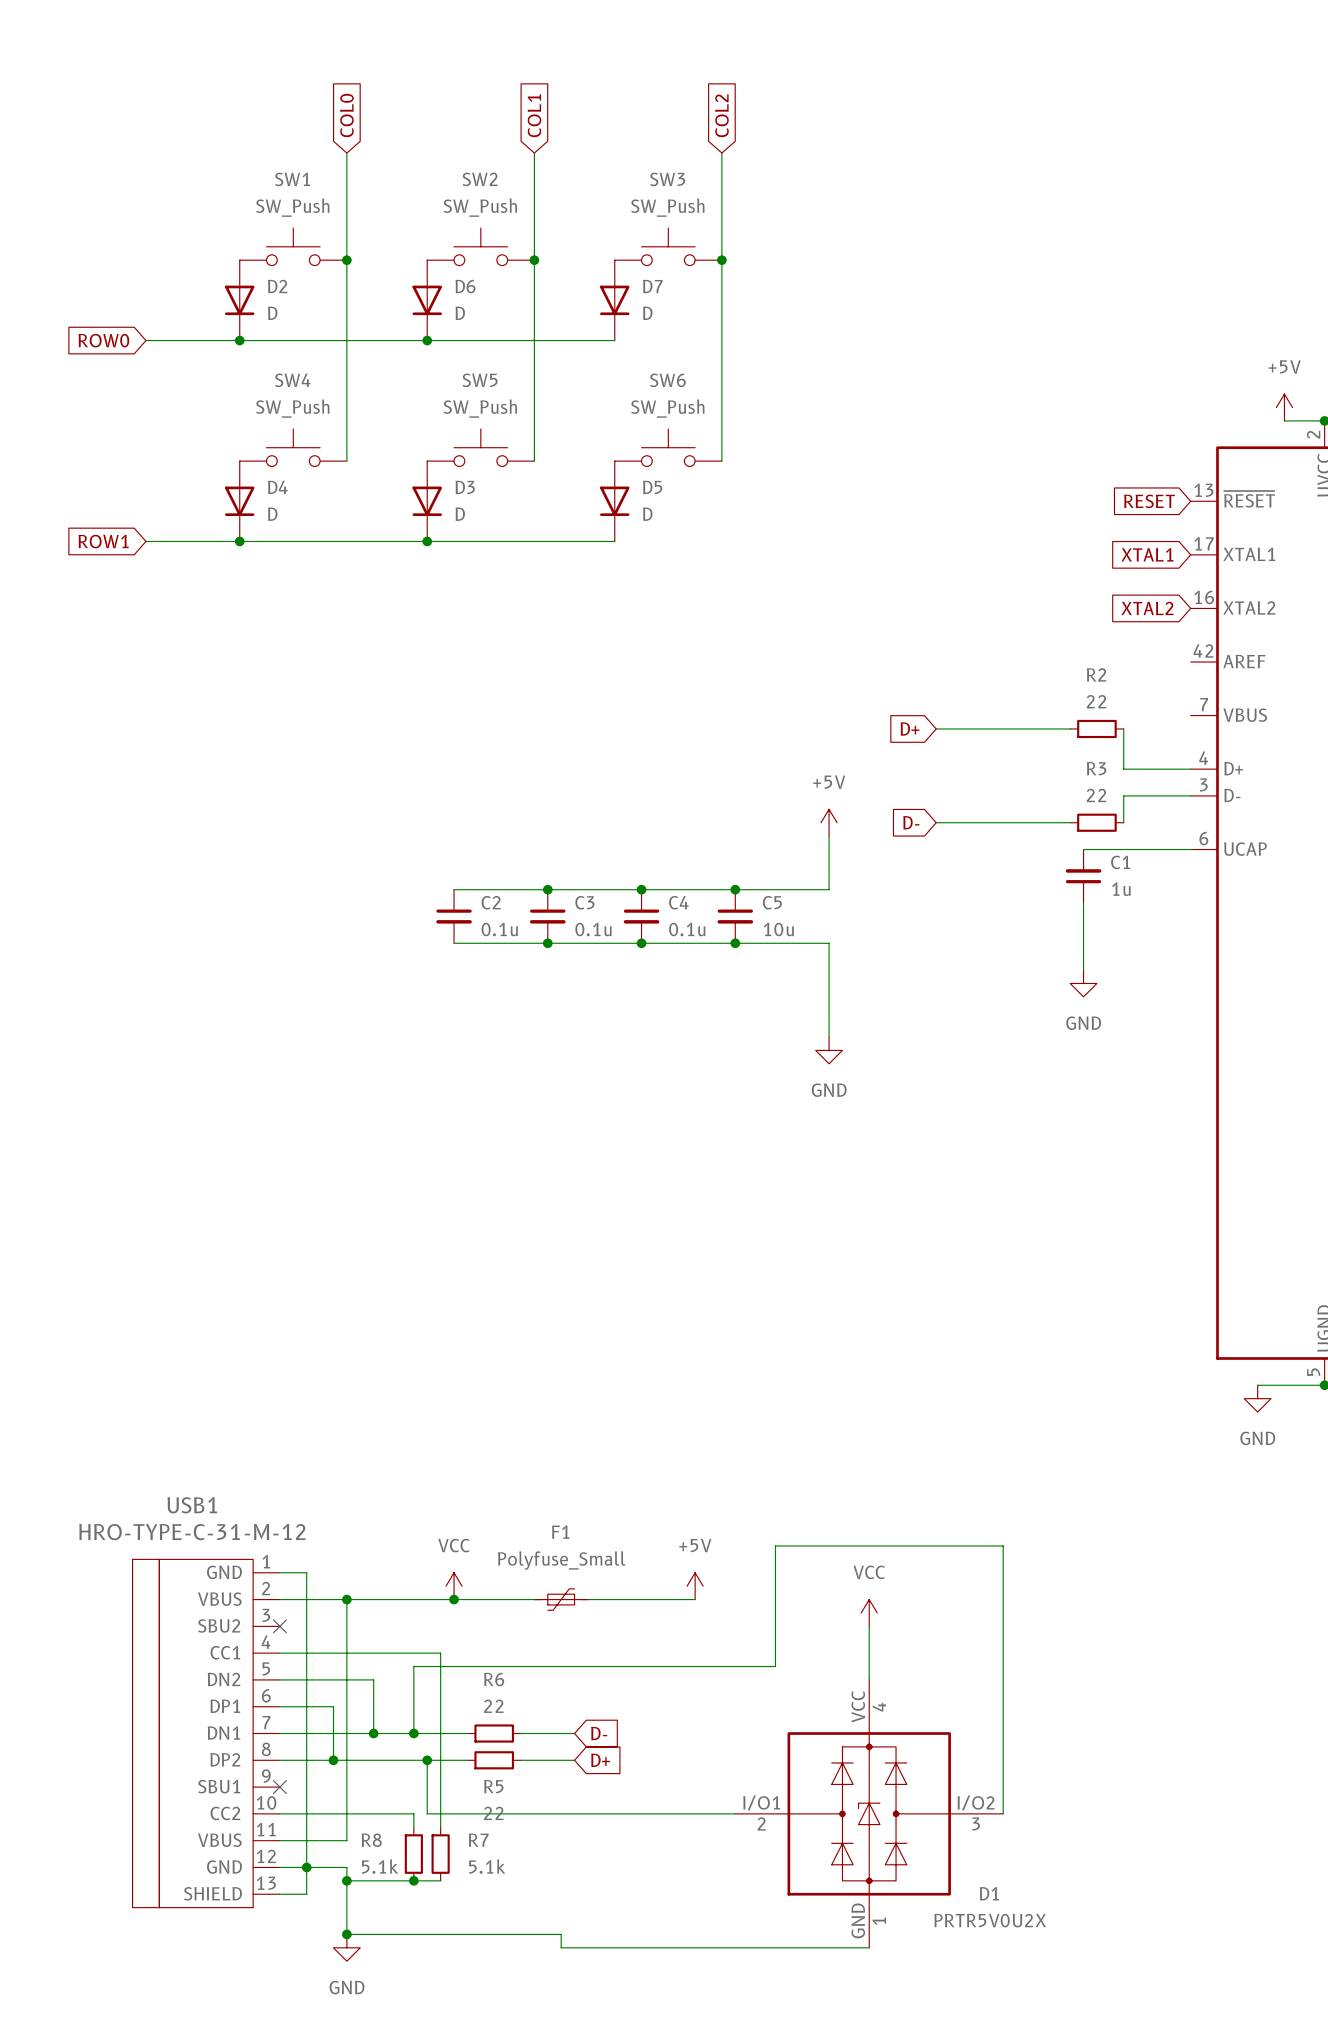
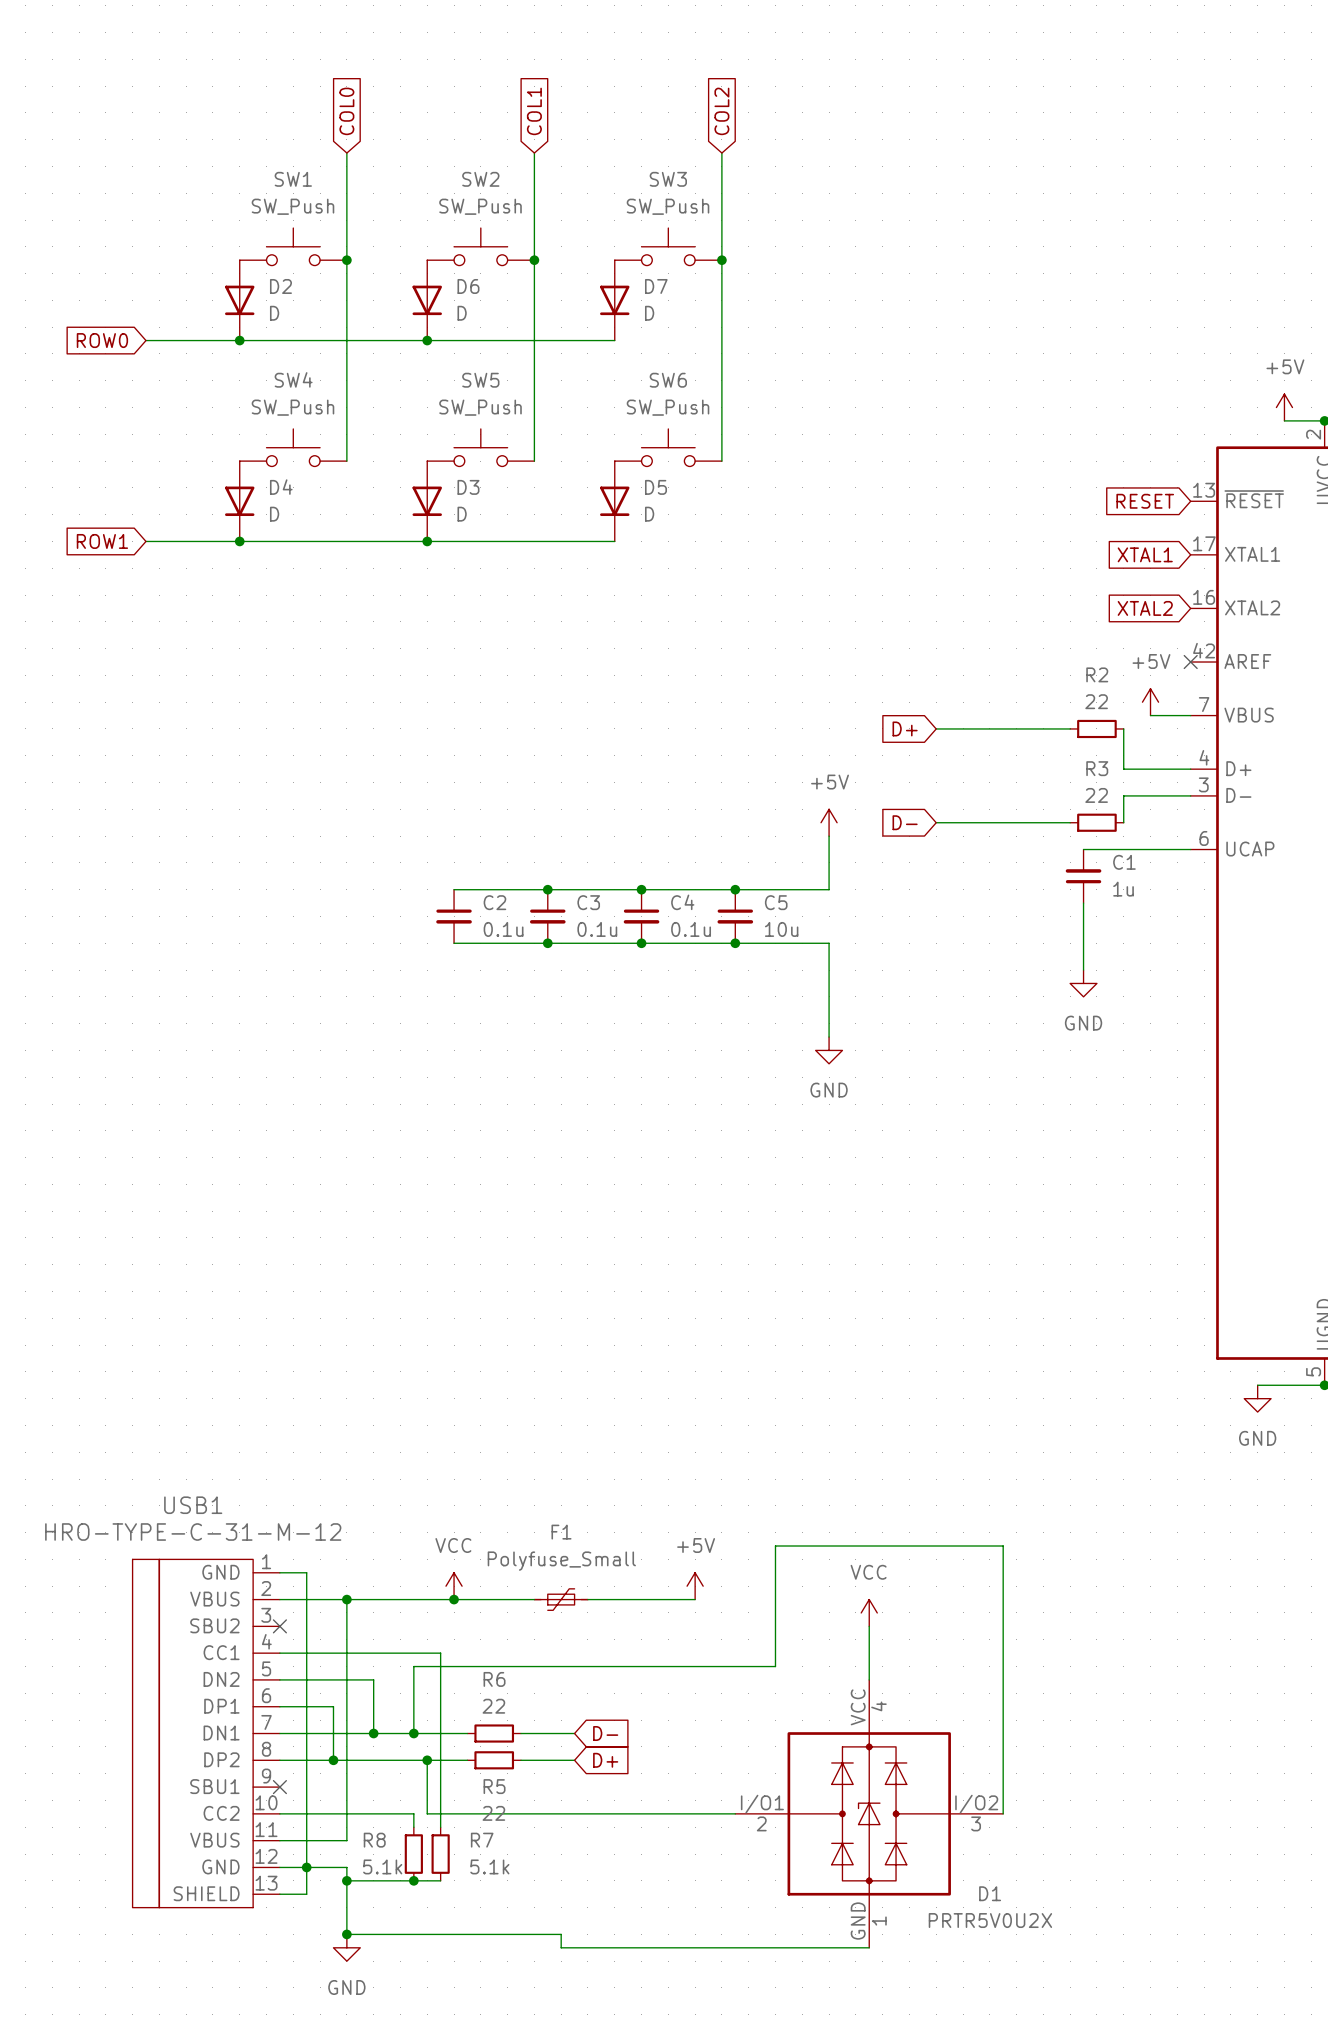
no-connect mark: none -> (1190, 662)
power symbol: none -> +5V (1150, 702)
wire: none -> (1150, 715) (1190, 715)

